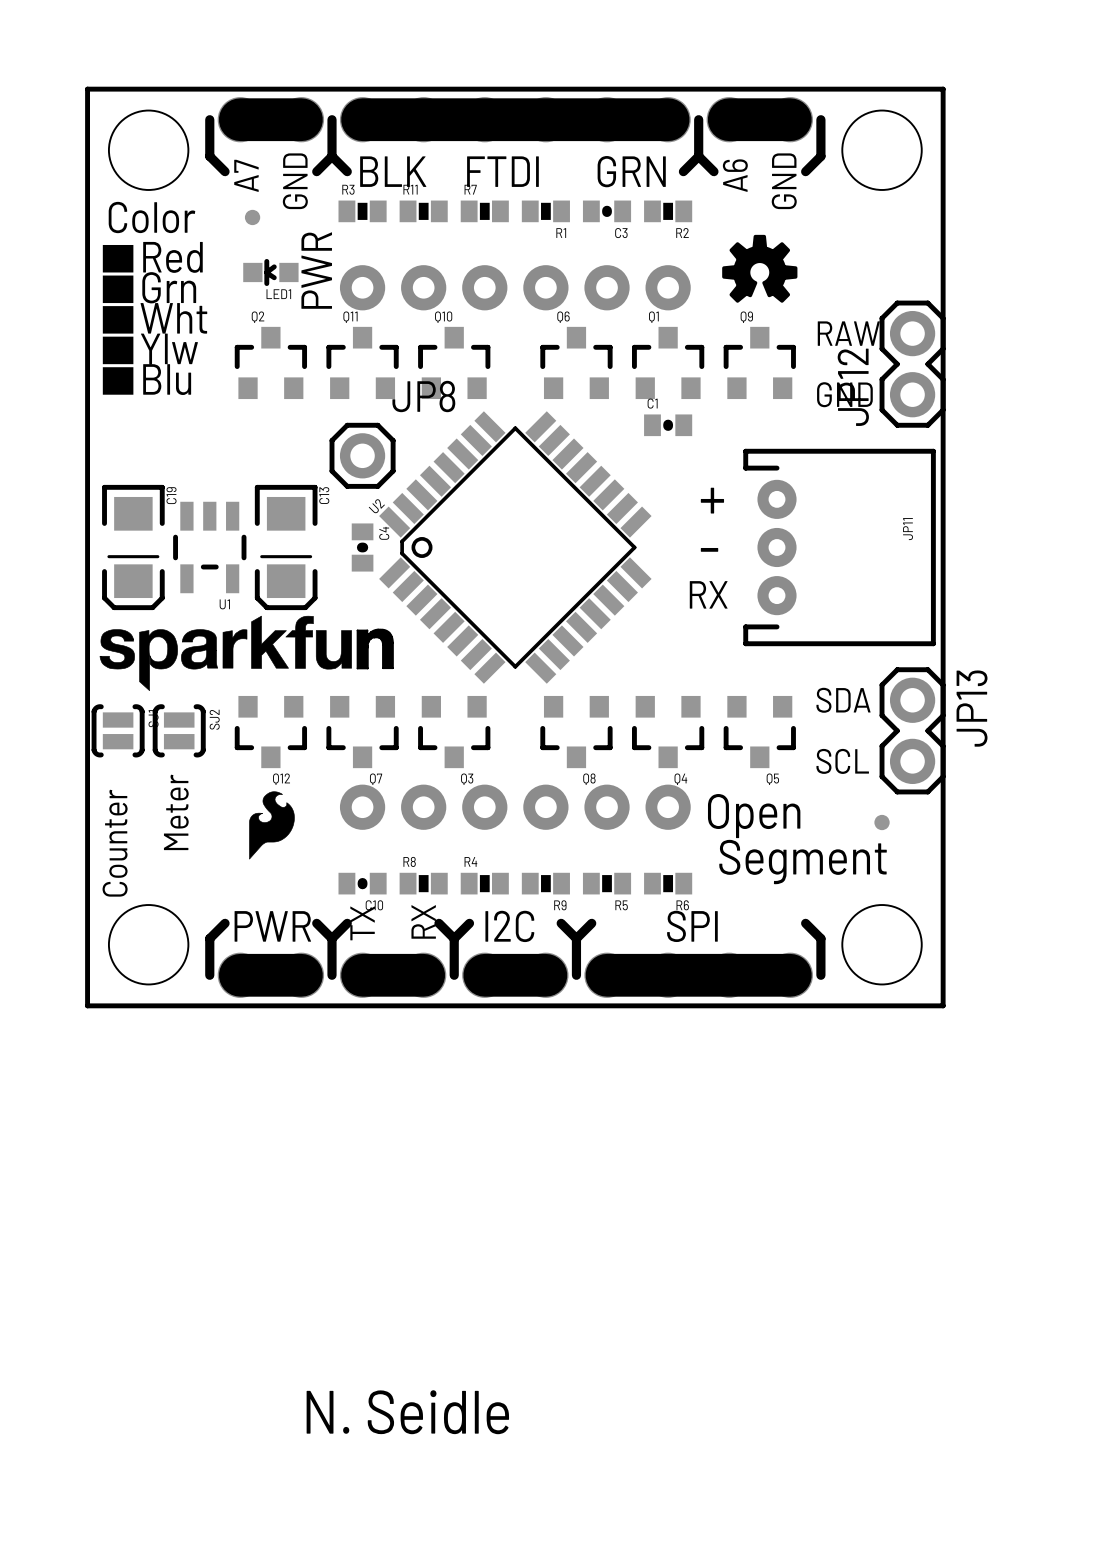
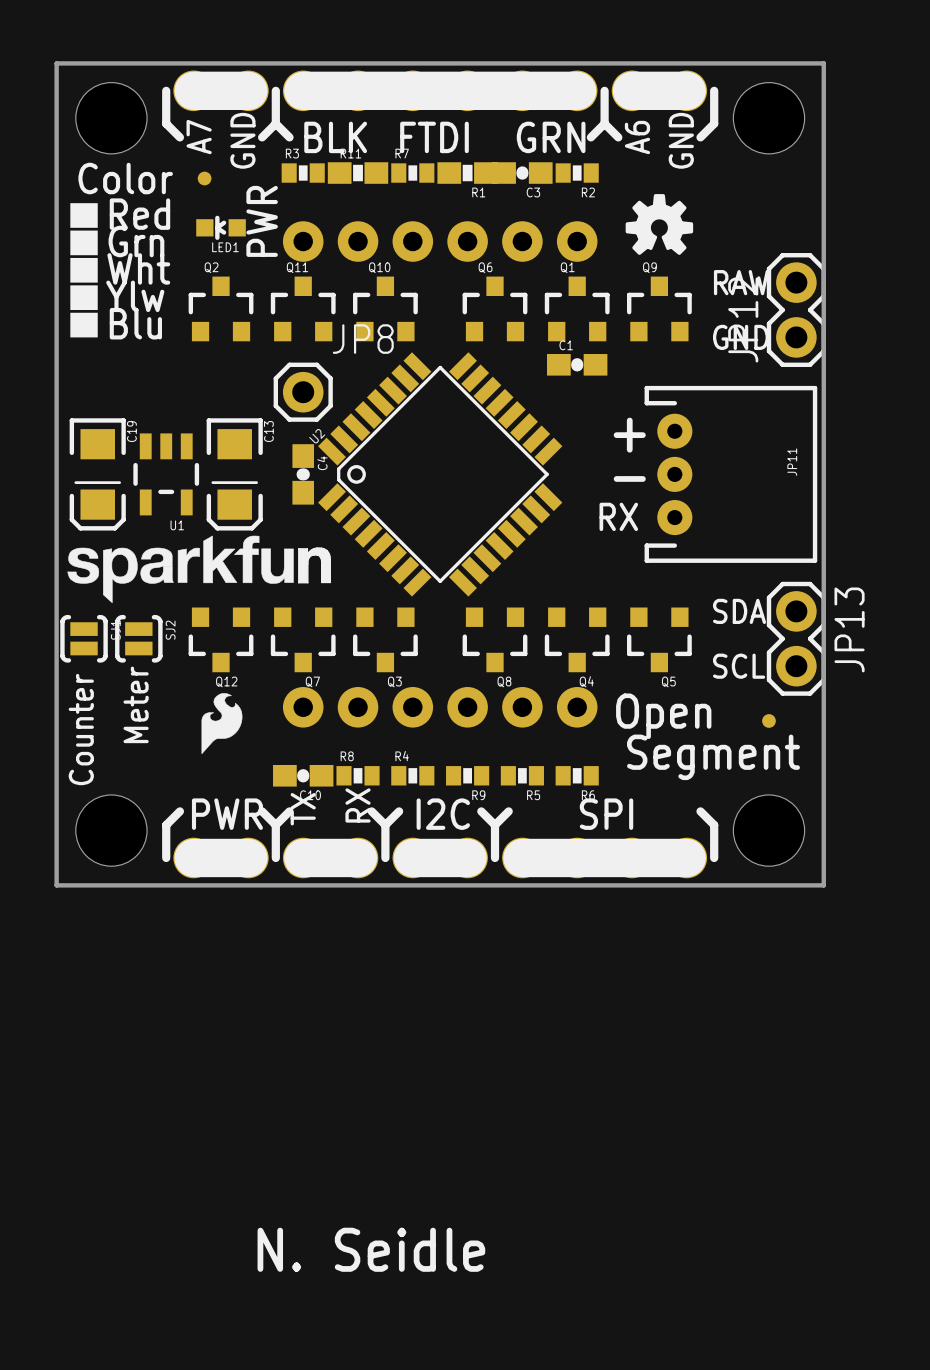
R11 footprint: [399, 200, 448, 223] -> [327, 162, 389, 184]
R1 footprint: [521, 200, 570, 223] -> [437, 162, 498, 184]
C3 footprint: [582, 200, 632, 223] -> [492, 162, 553, 184]
C1 footprint: [644, 414, 693, 437] -> [547, 354, 608, 376]
C4 footprint: [351, 523, 374, 572] -> [292, 444, 315, 505]
C10 footprint: [338, 872, 387, 895] -> [273, 764, 334, 787]

